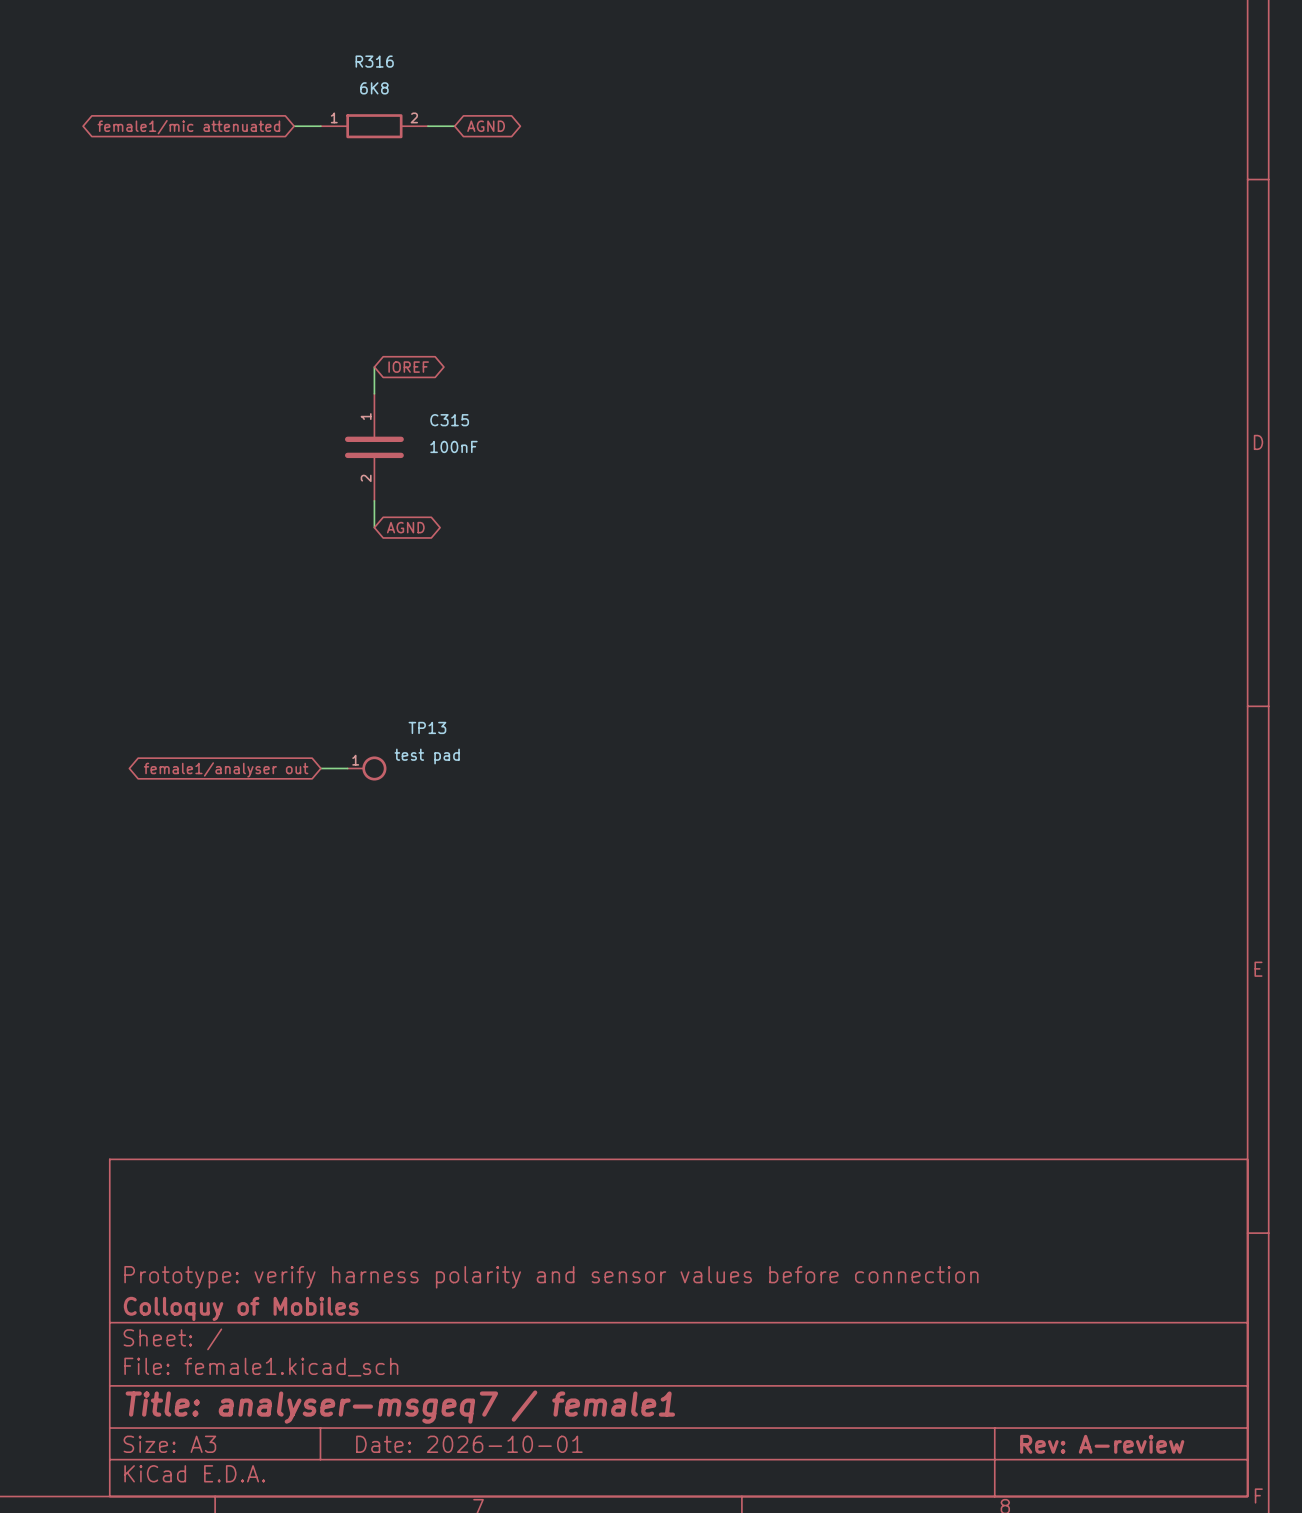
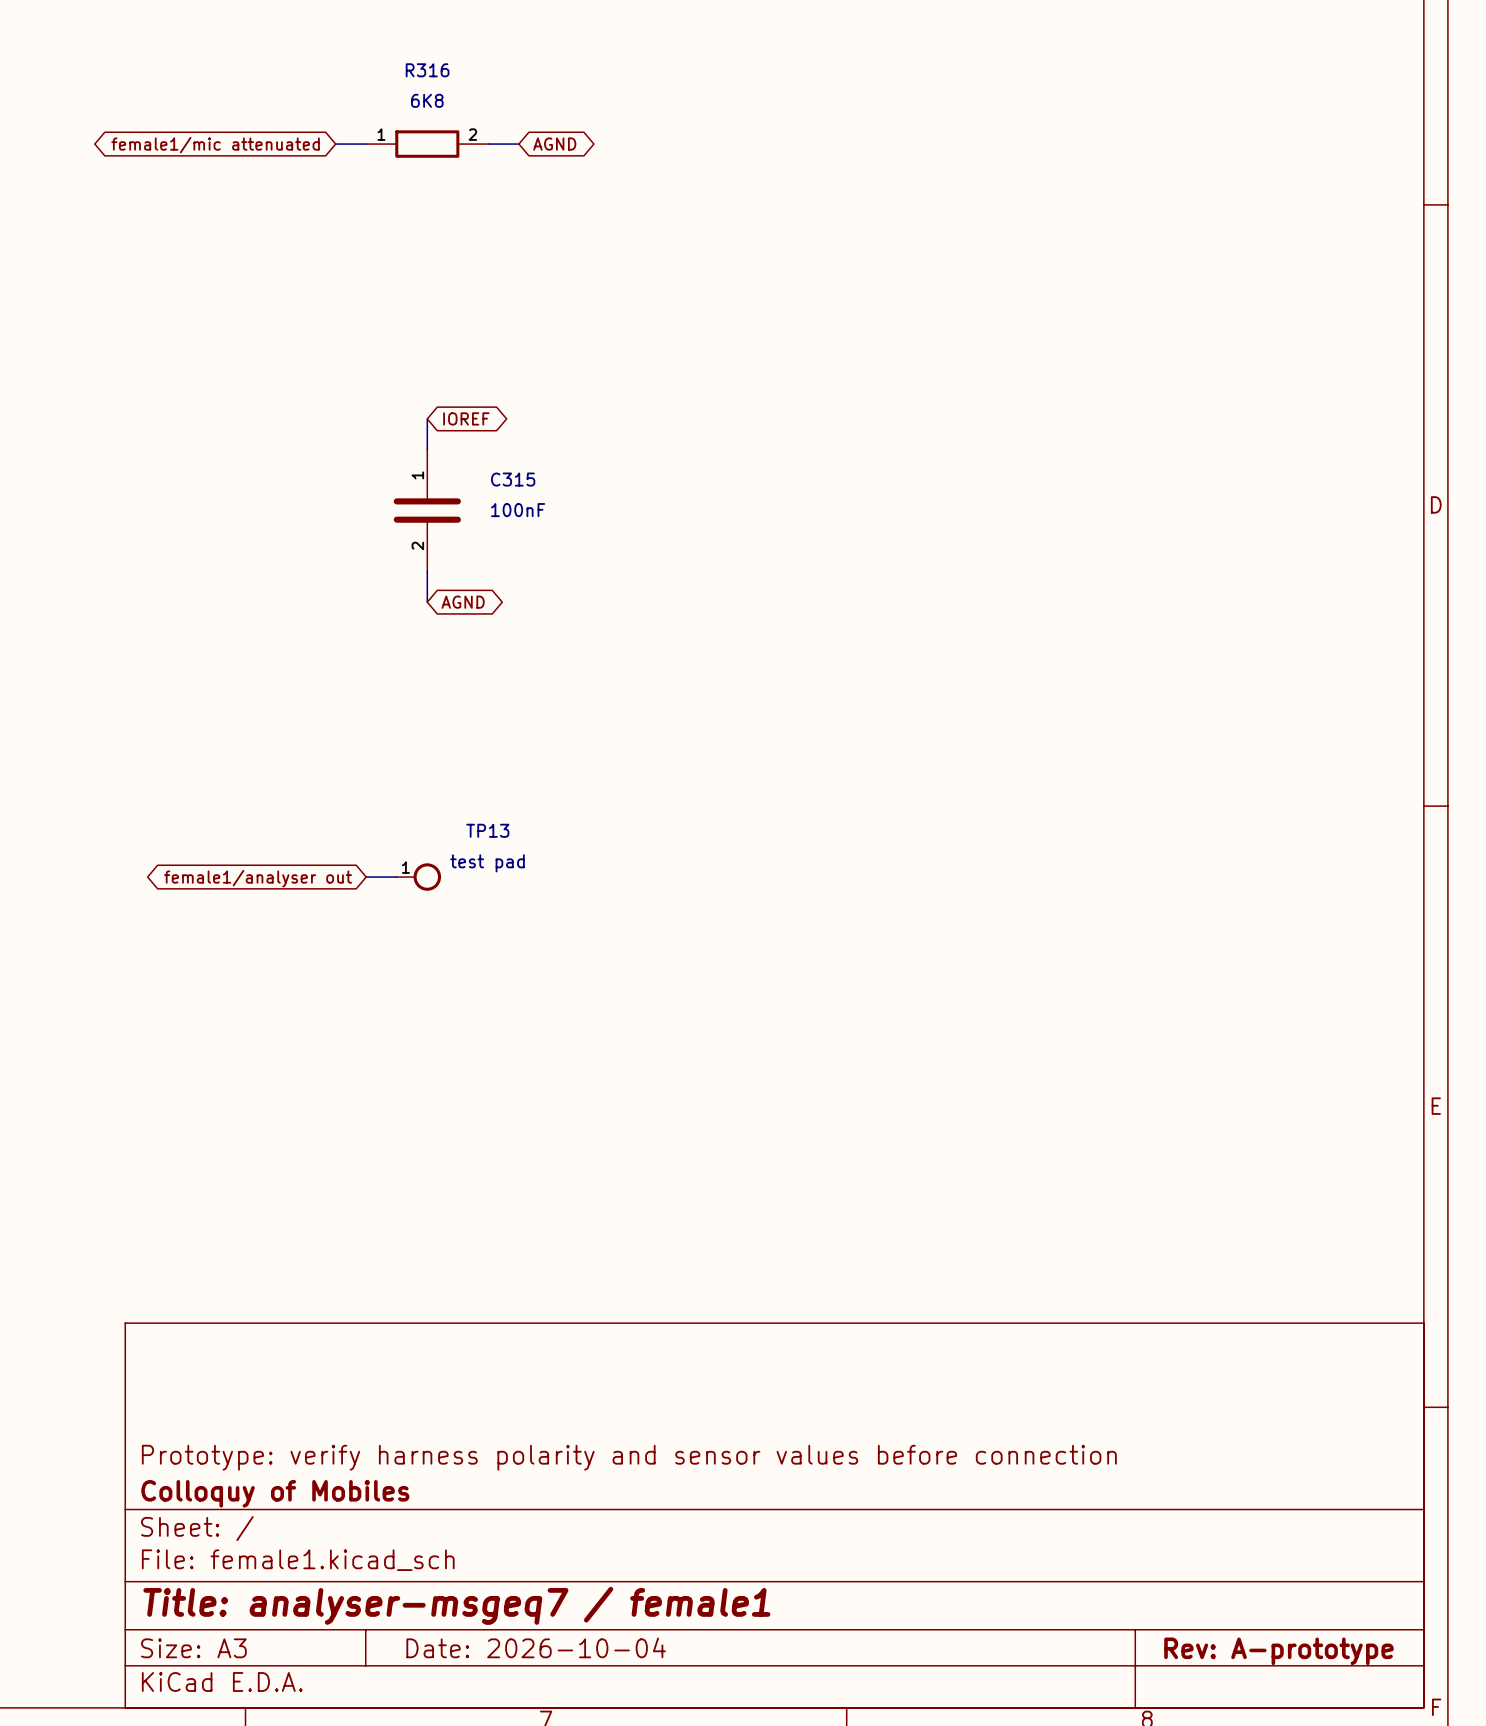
title block: Date: 2026-10-01 (469, 1444) -> Date: 2026-10-04 (536, 1647)
title block: Rev: A-review (1102, 1444) -> Rev: A-prototype (1278, 1651)

